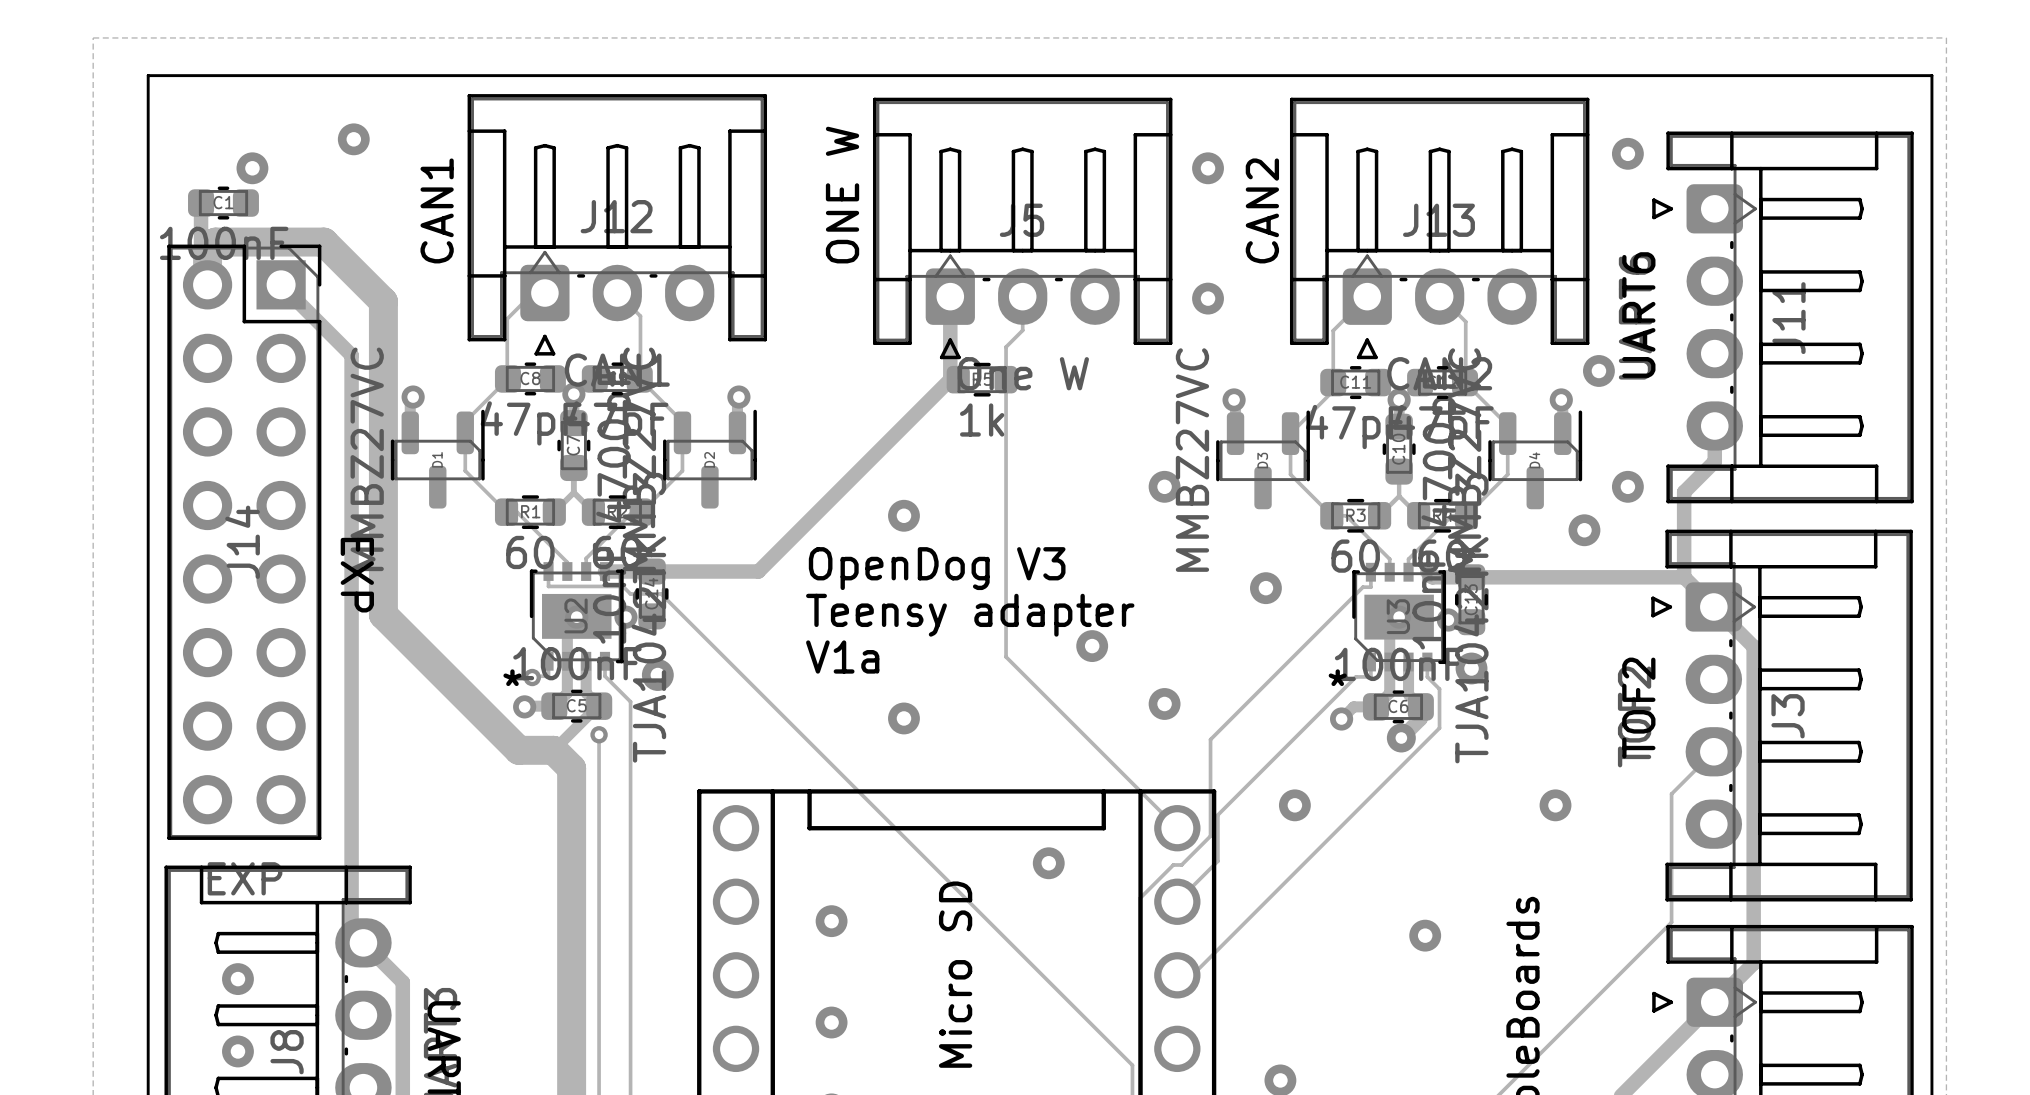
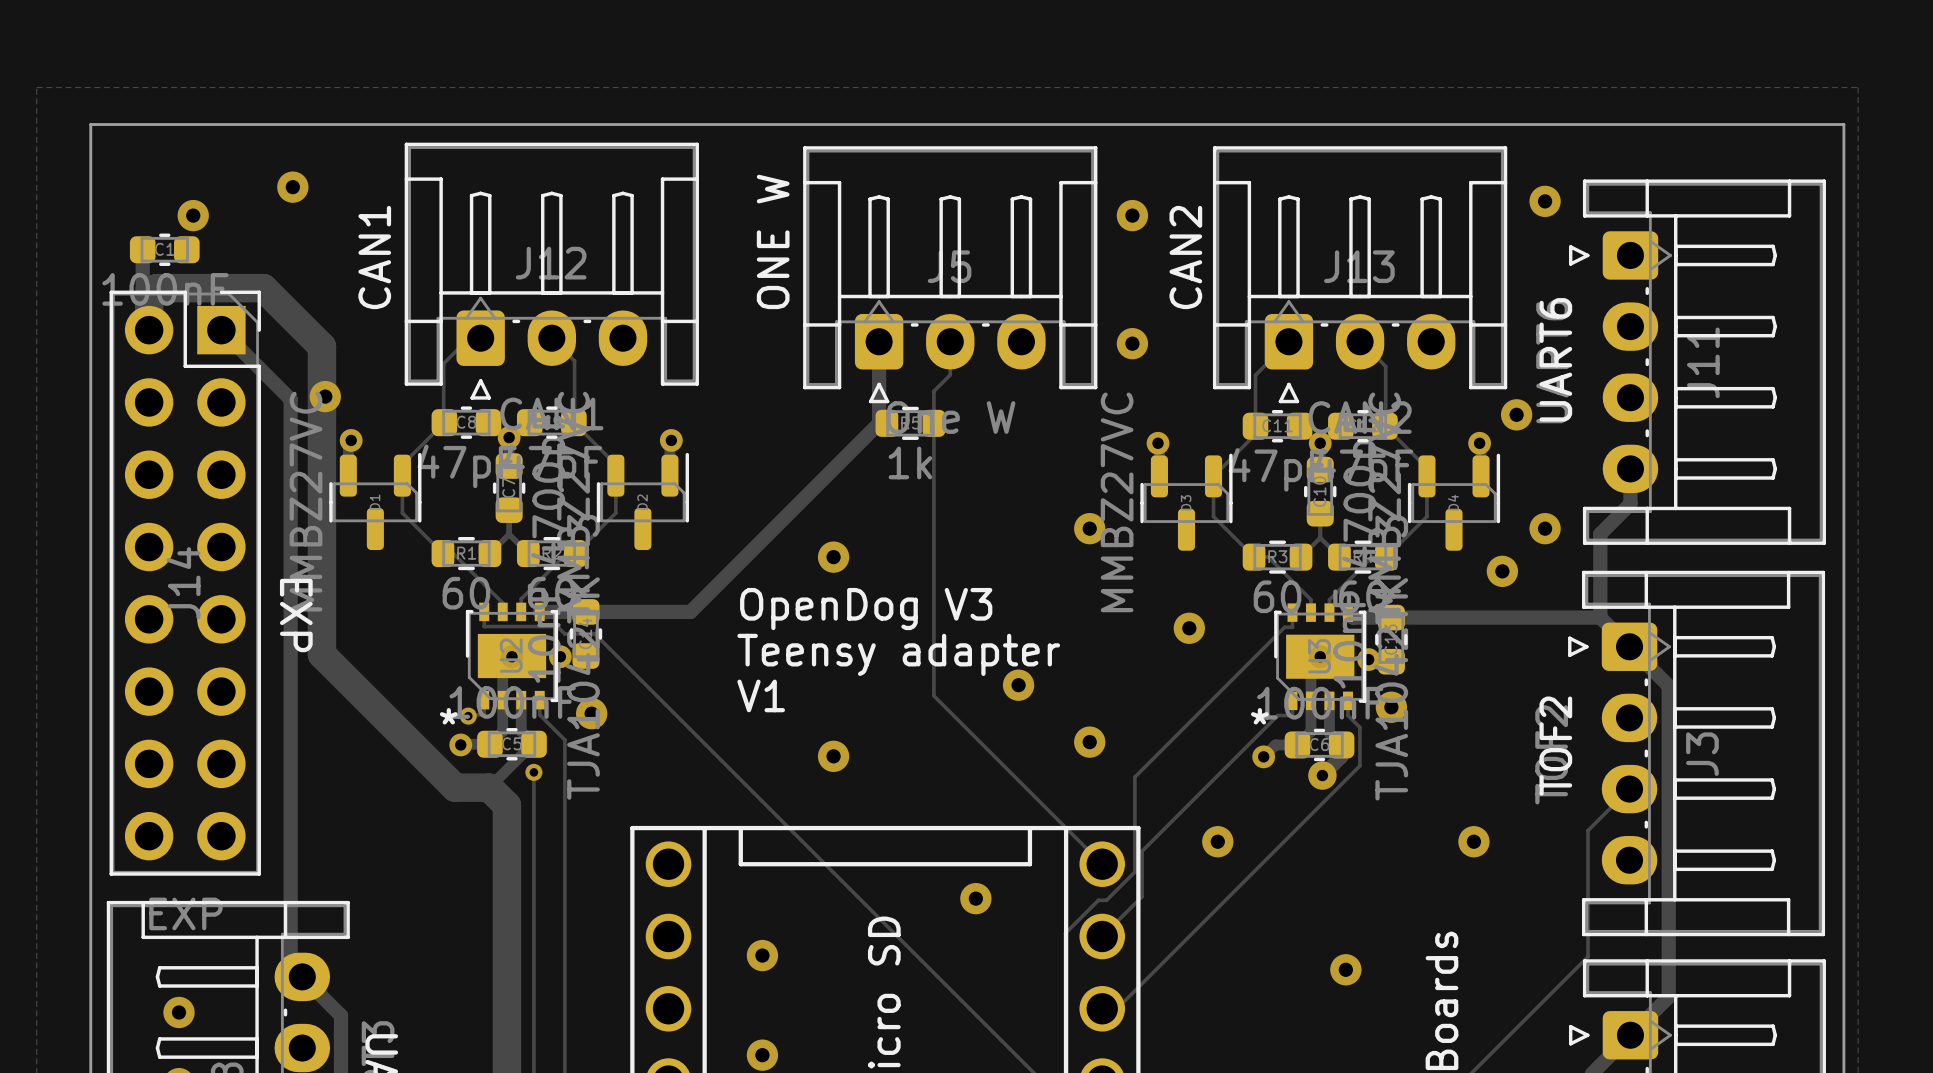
via: none -> (325, 396)
text: V1a (842, 657) -> V1 (761, 695)

